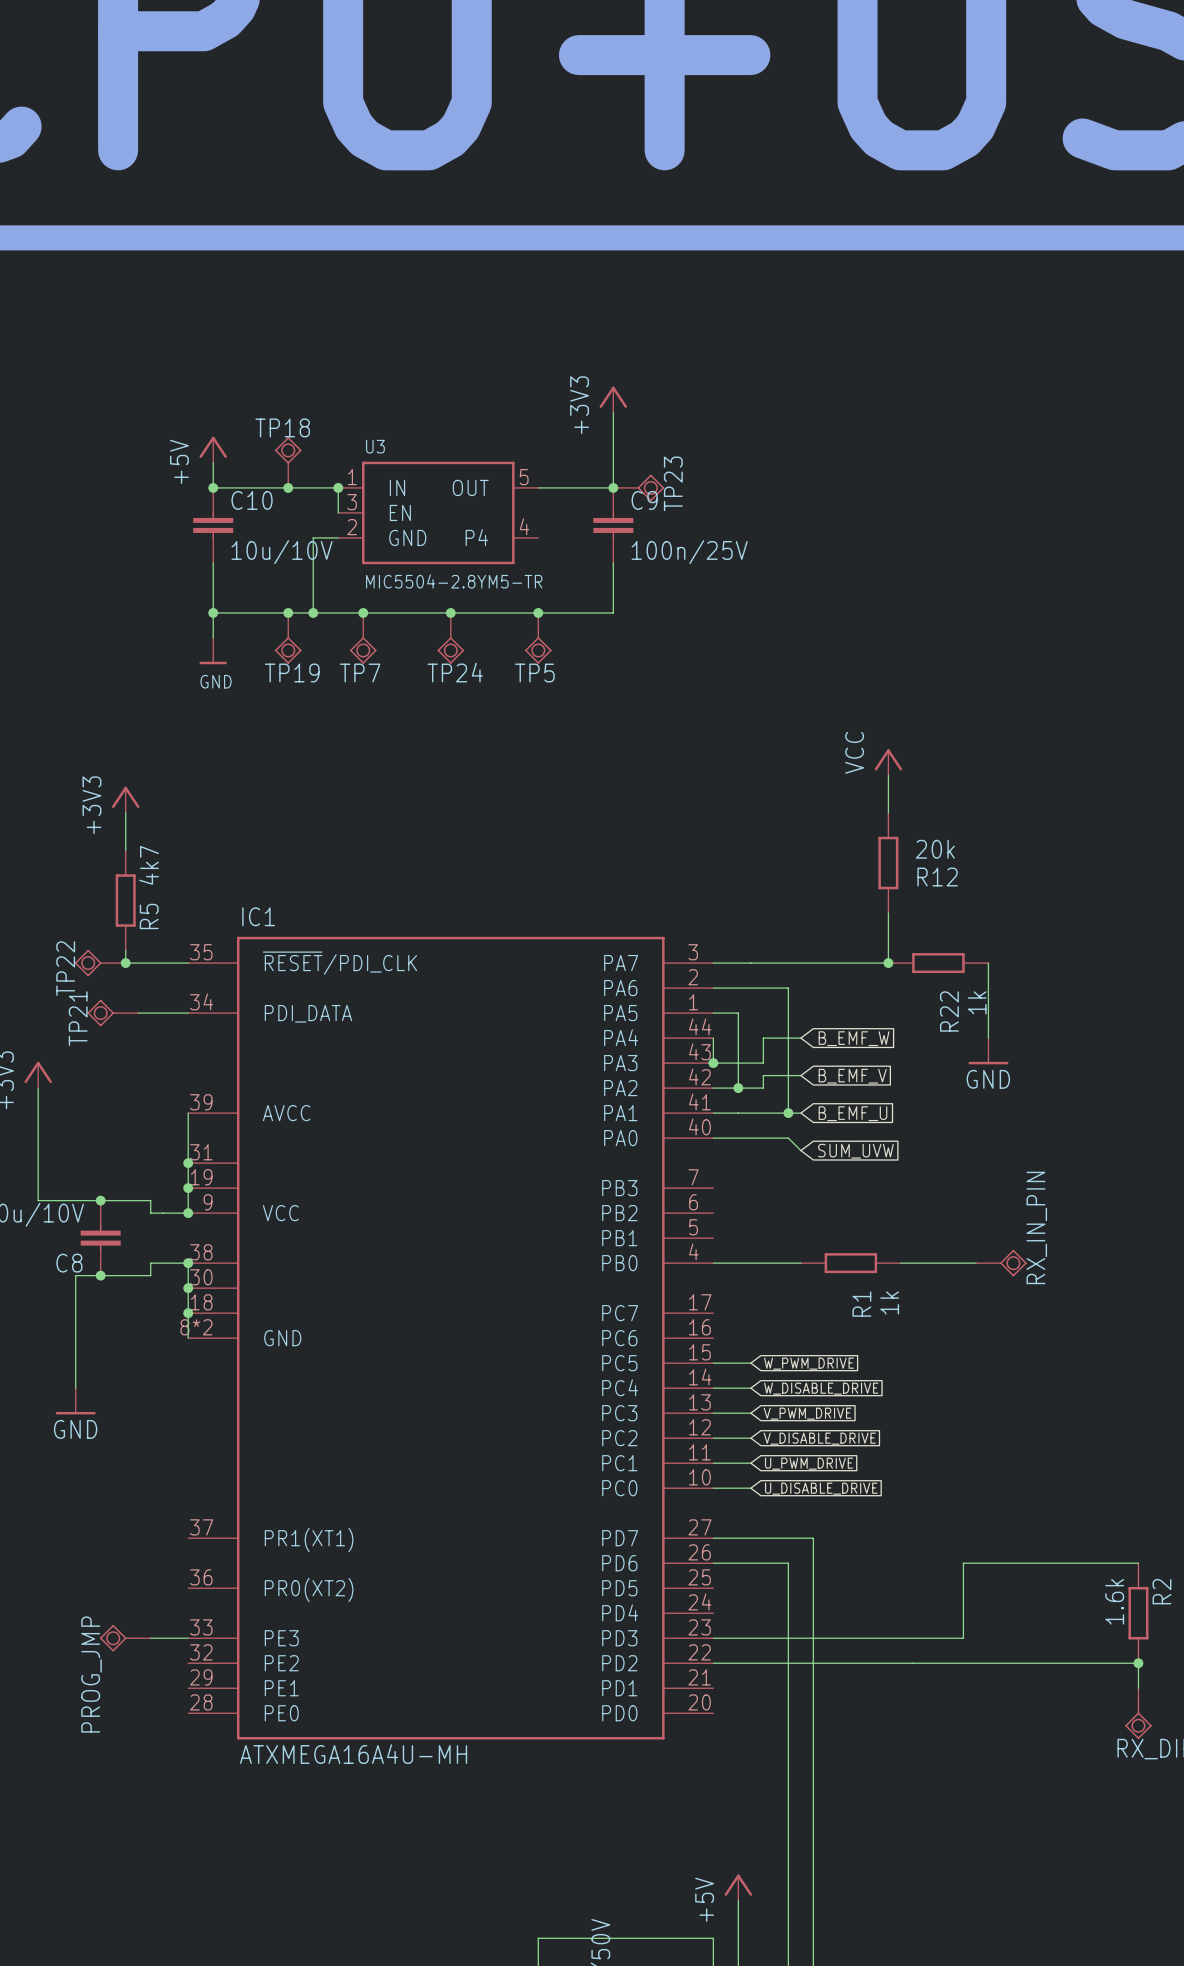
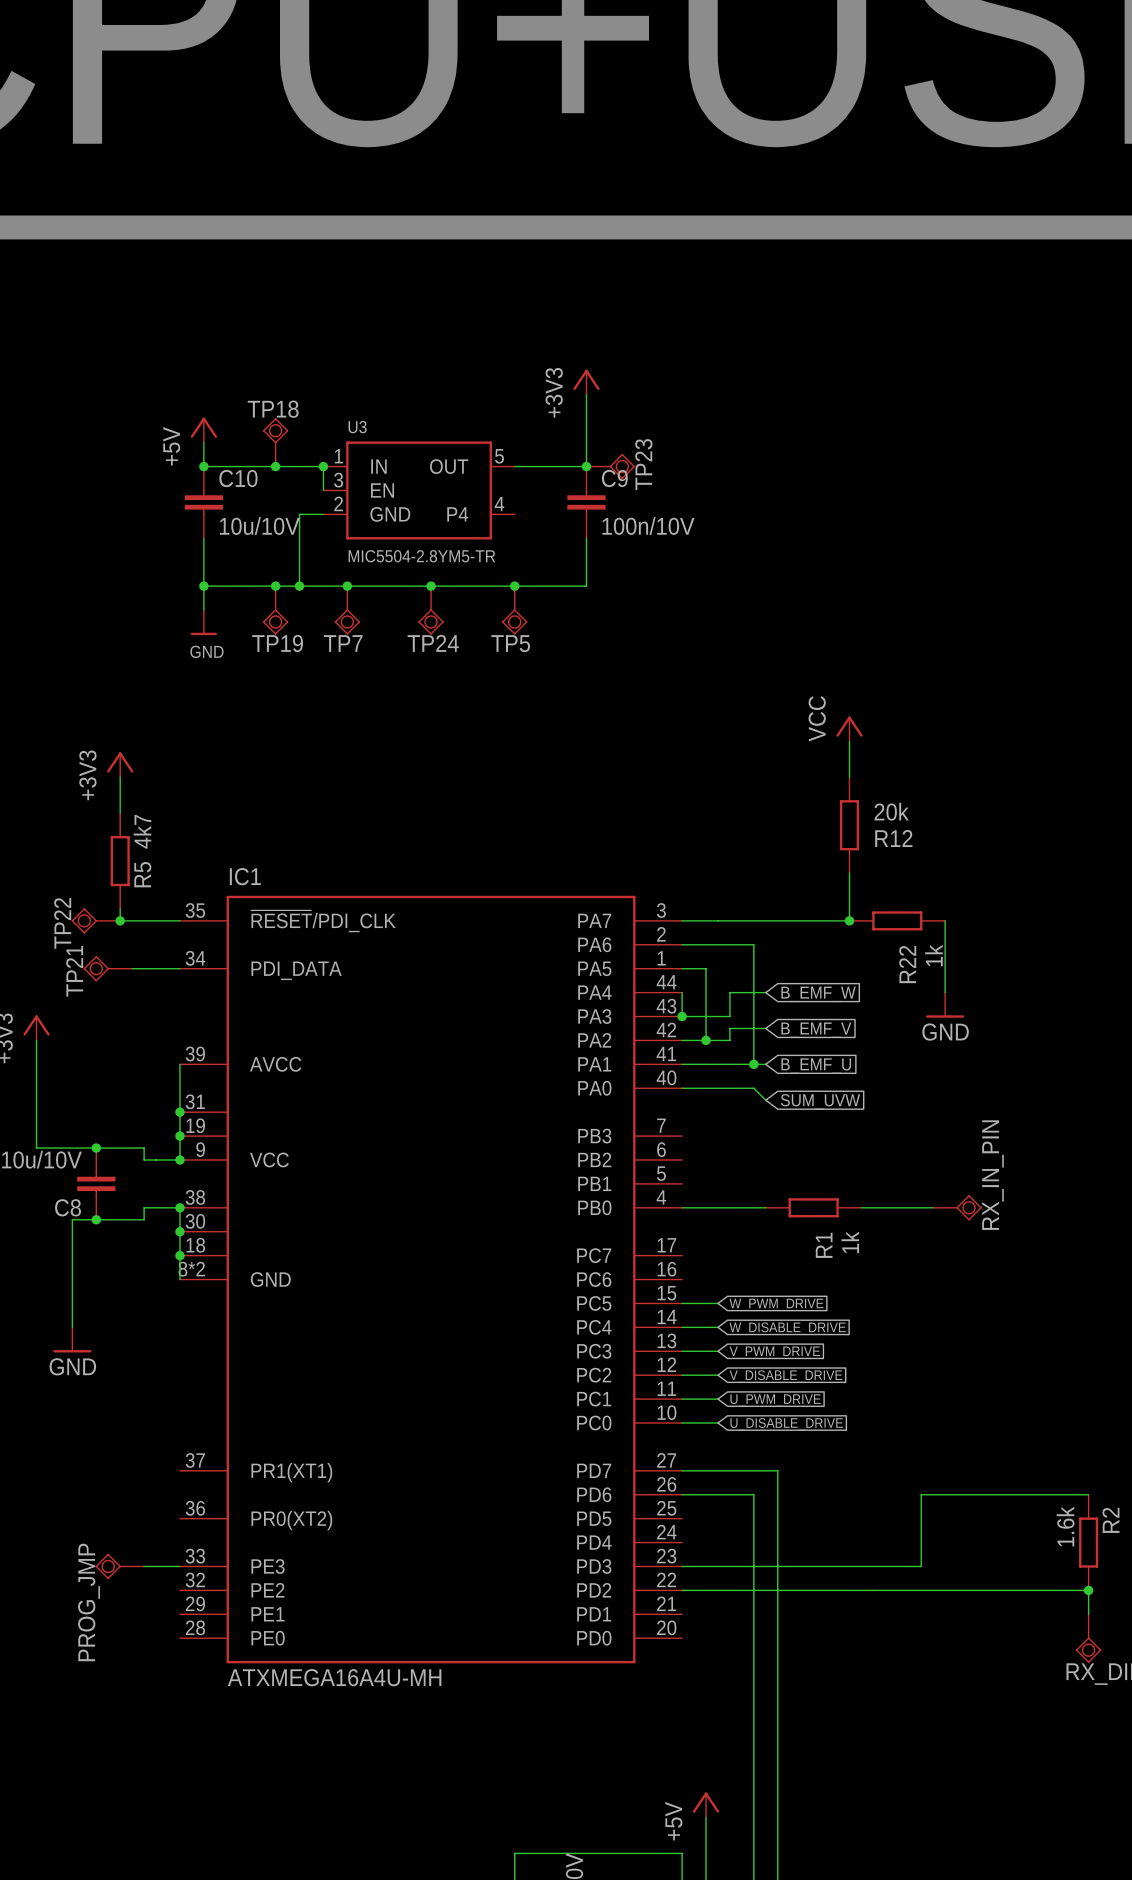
C9 value: 100n/25V (689, 552) -> 100n/10V (648, 526)

